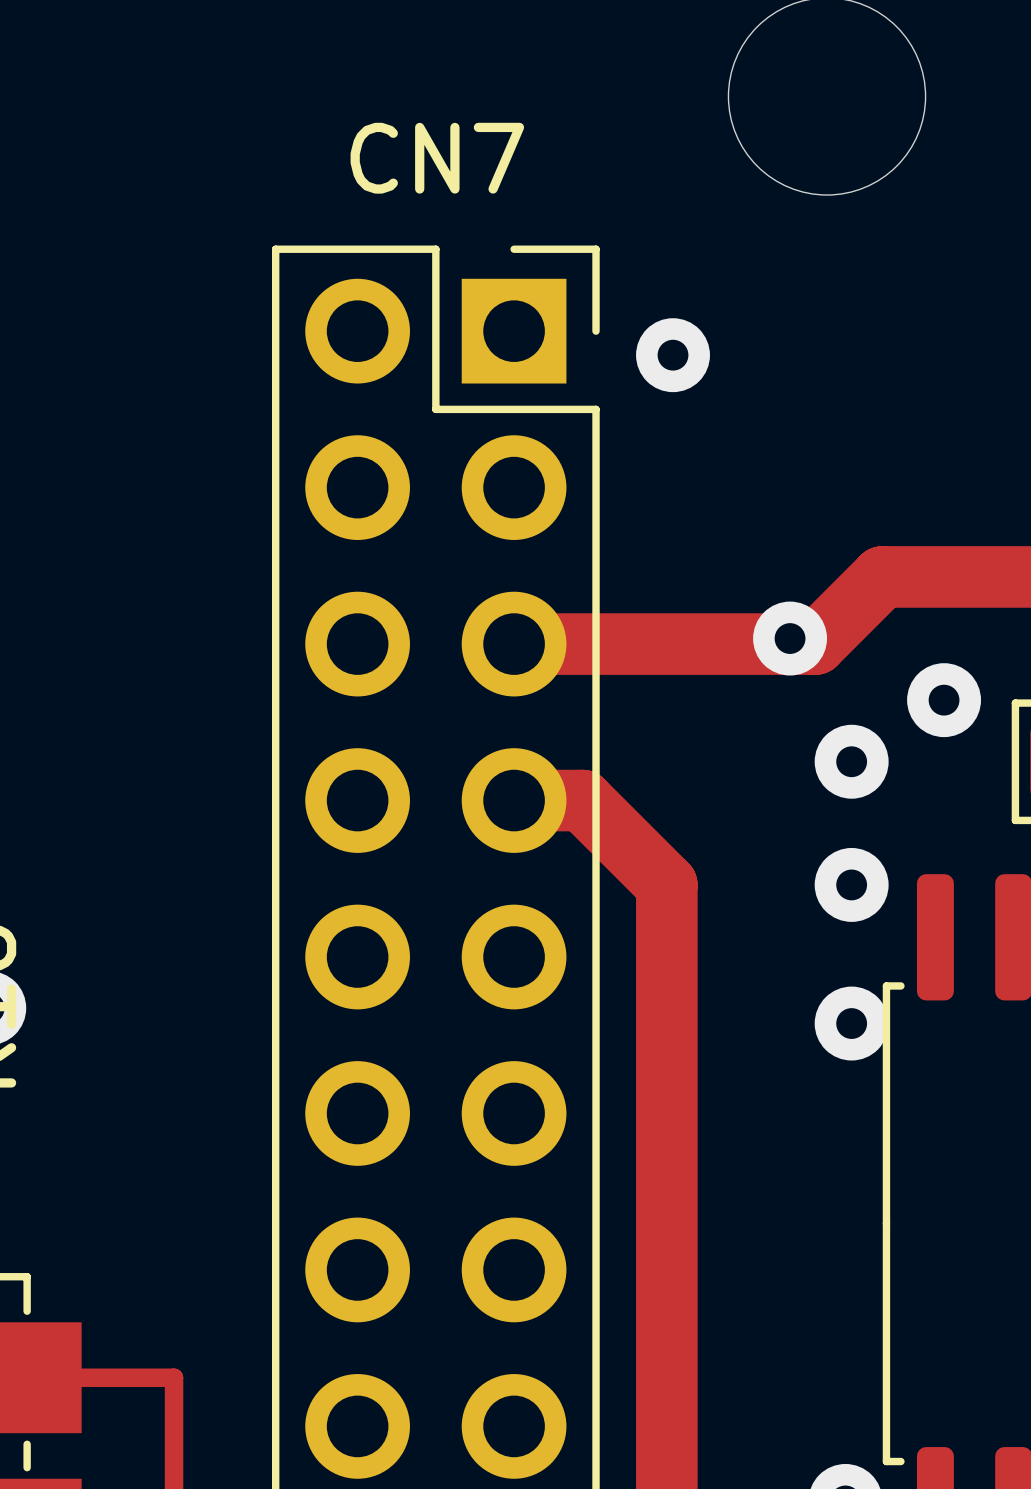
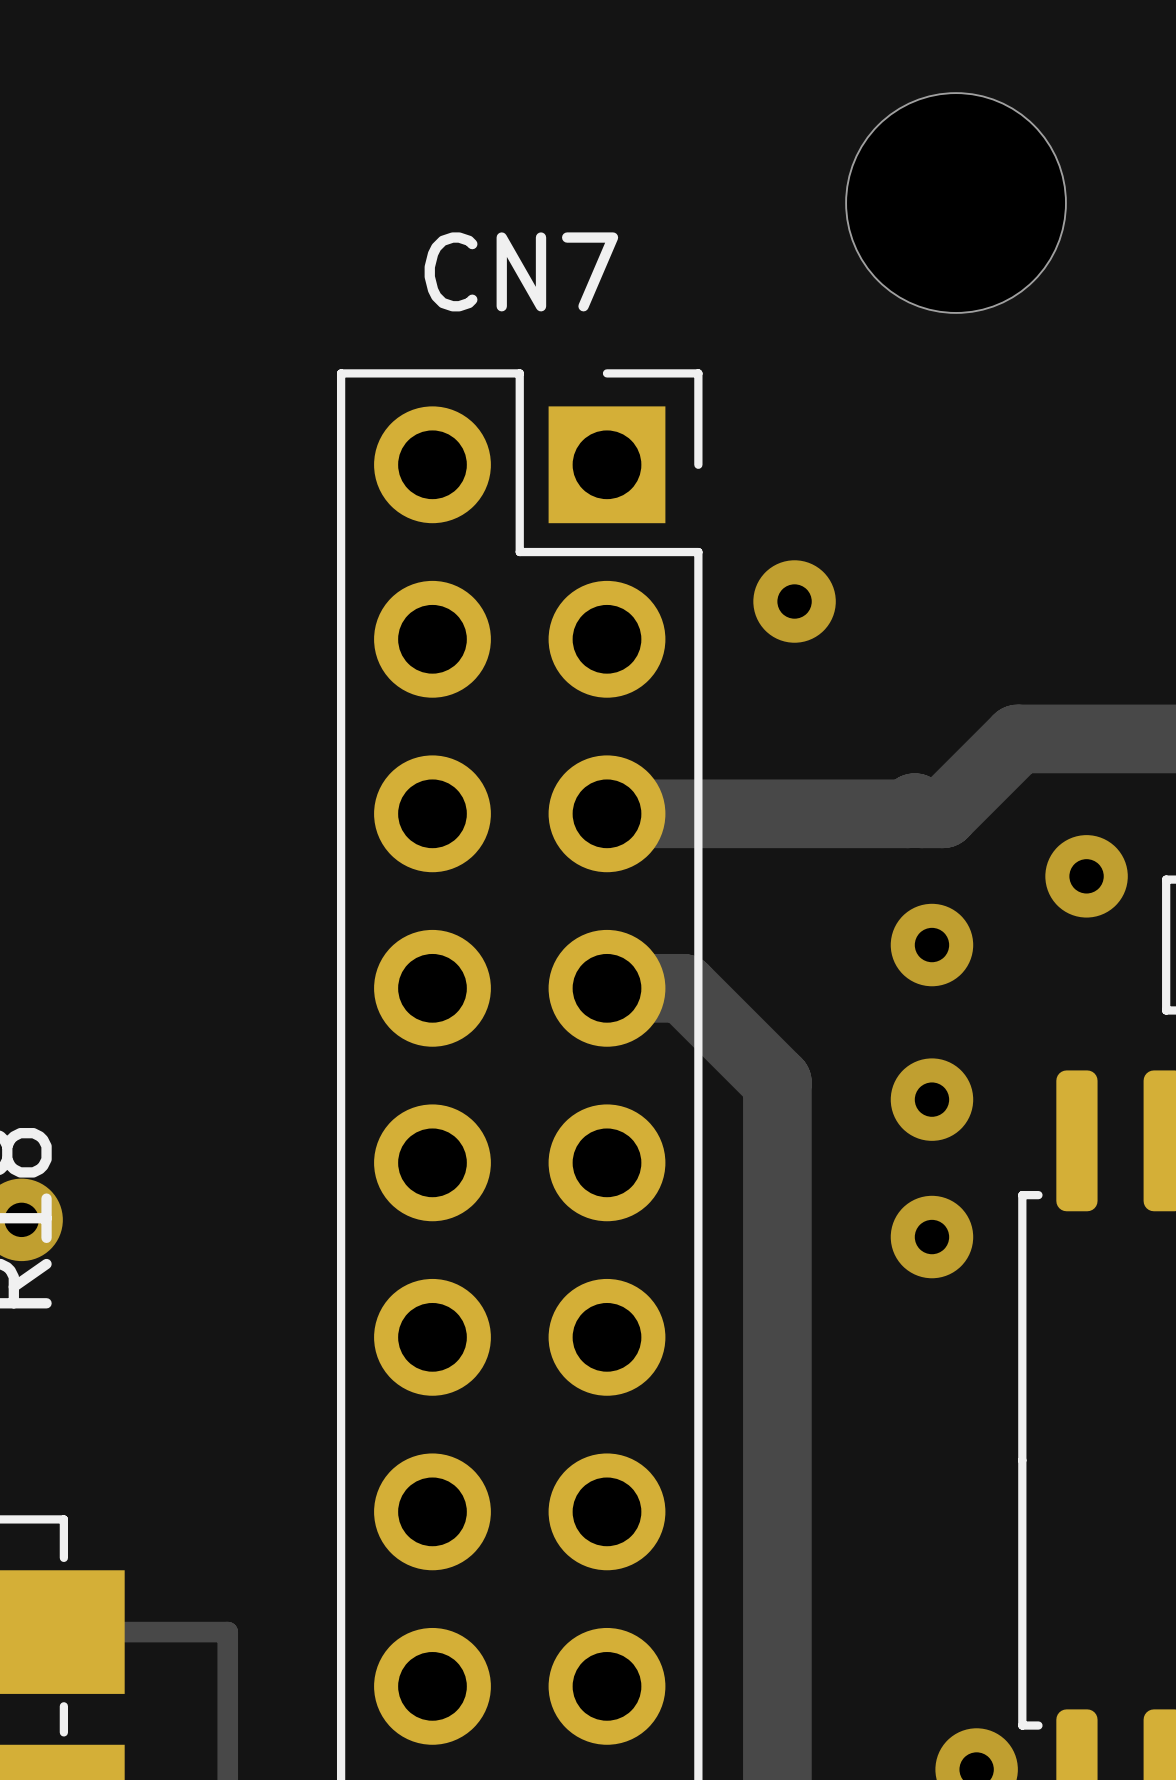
via position: (673, 355) -> (794, 601)
via: (790, 638) -> none
via position: (851, 761) -> (931, 945)
via position: (851, 884) -> (931, 1099)
via position: (851, 1023) -> (931, 1237)

